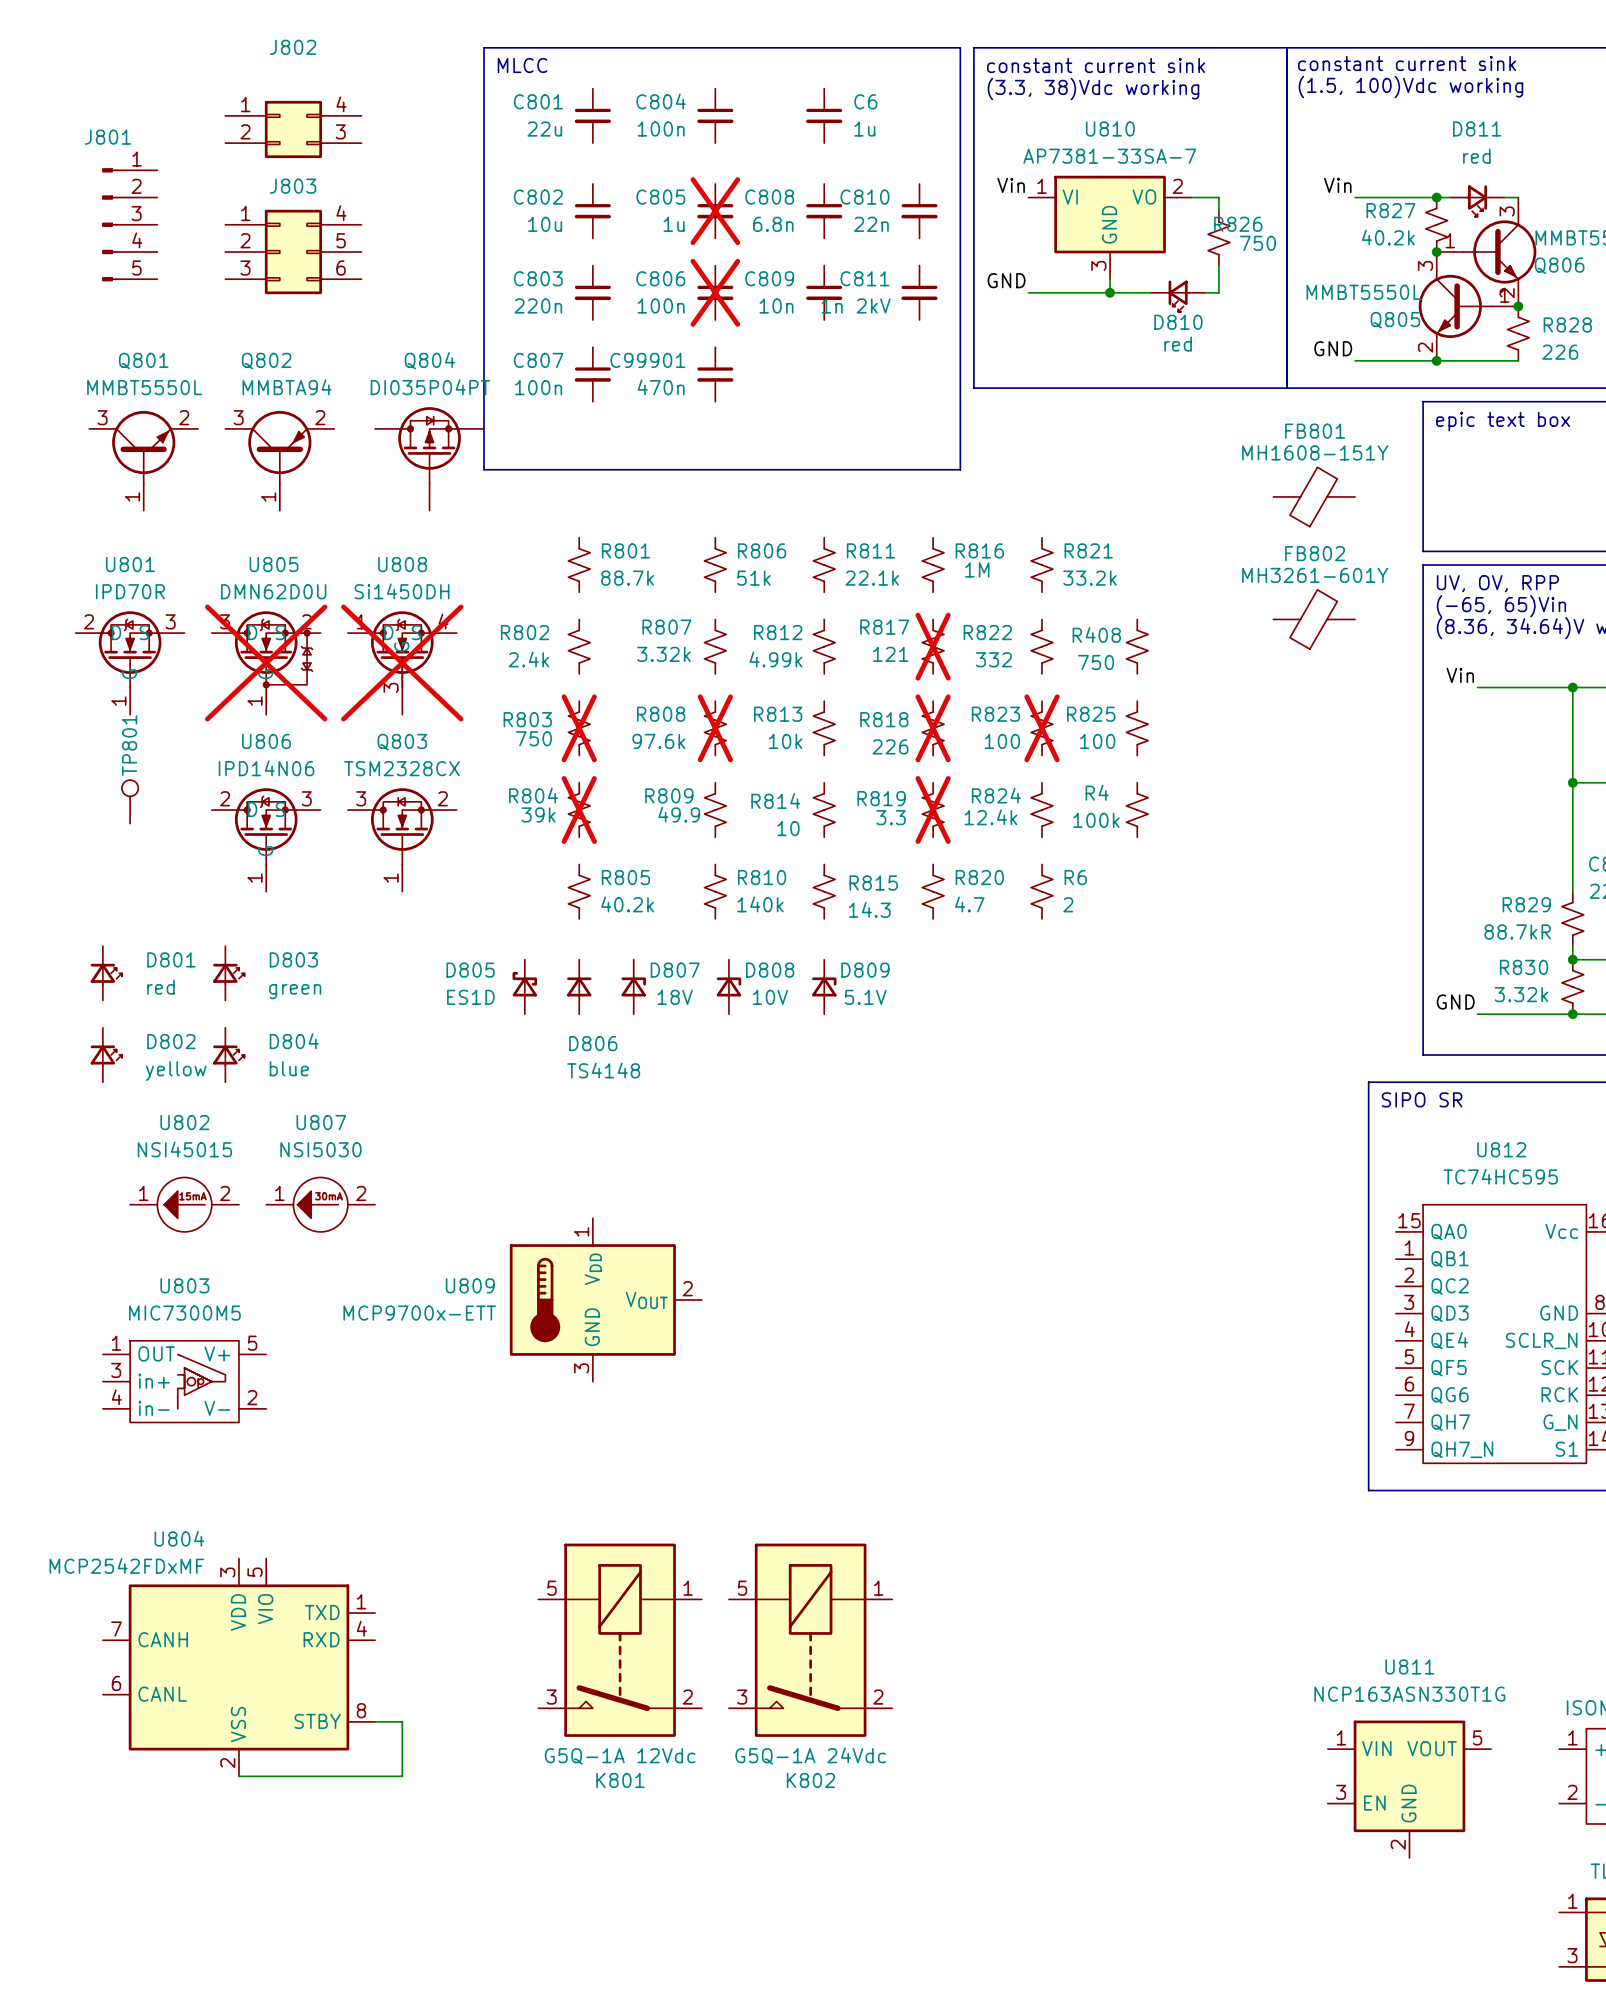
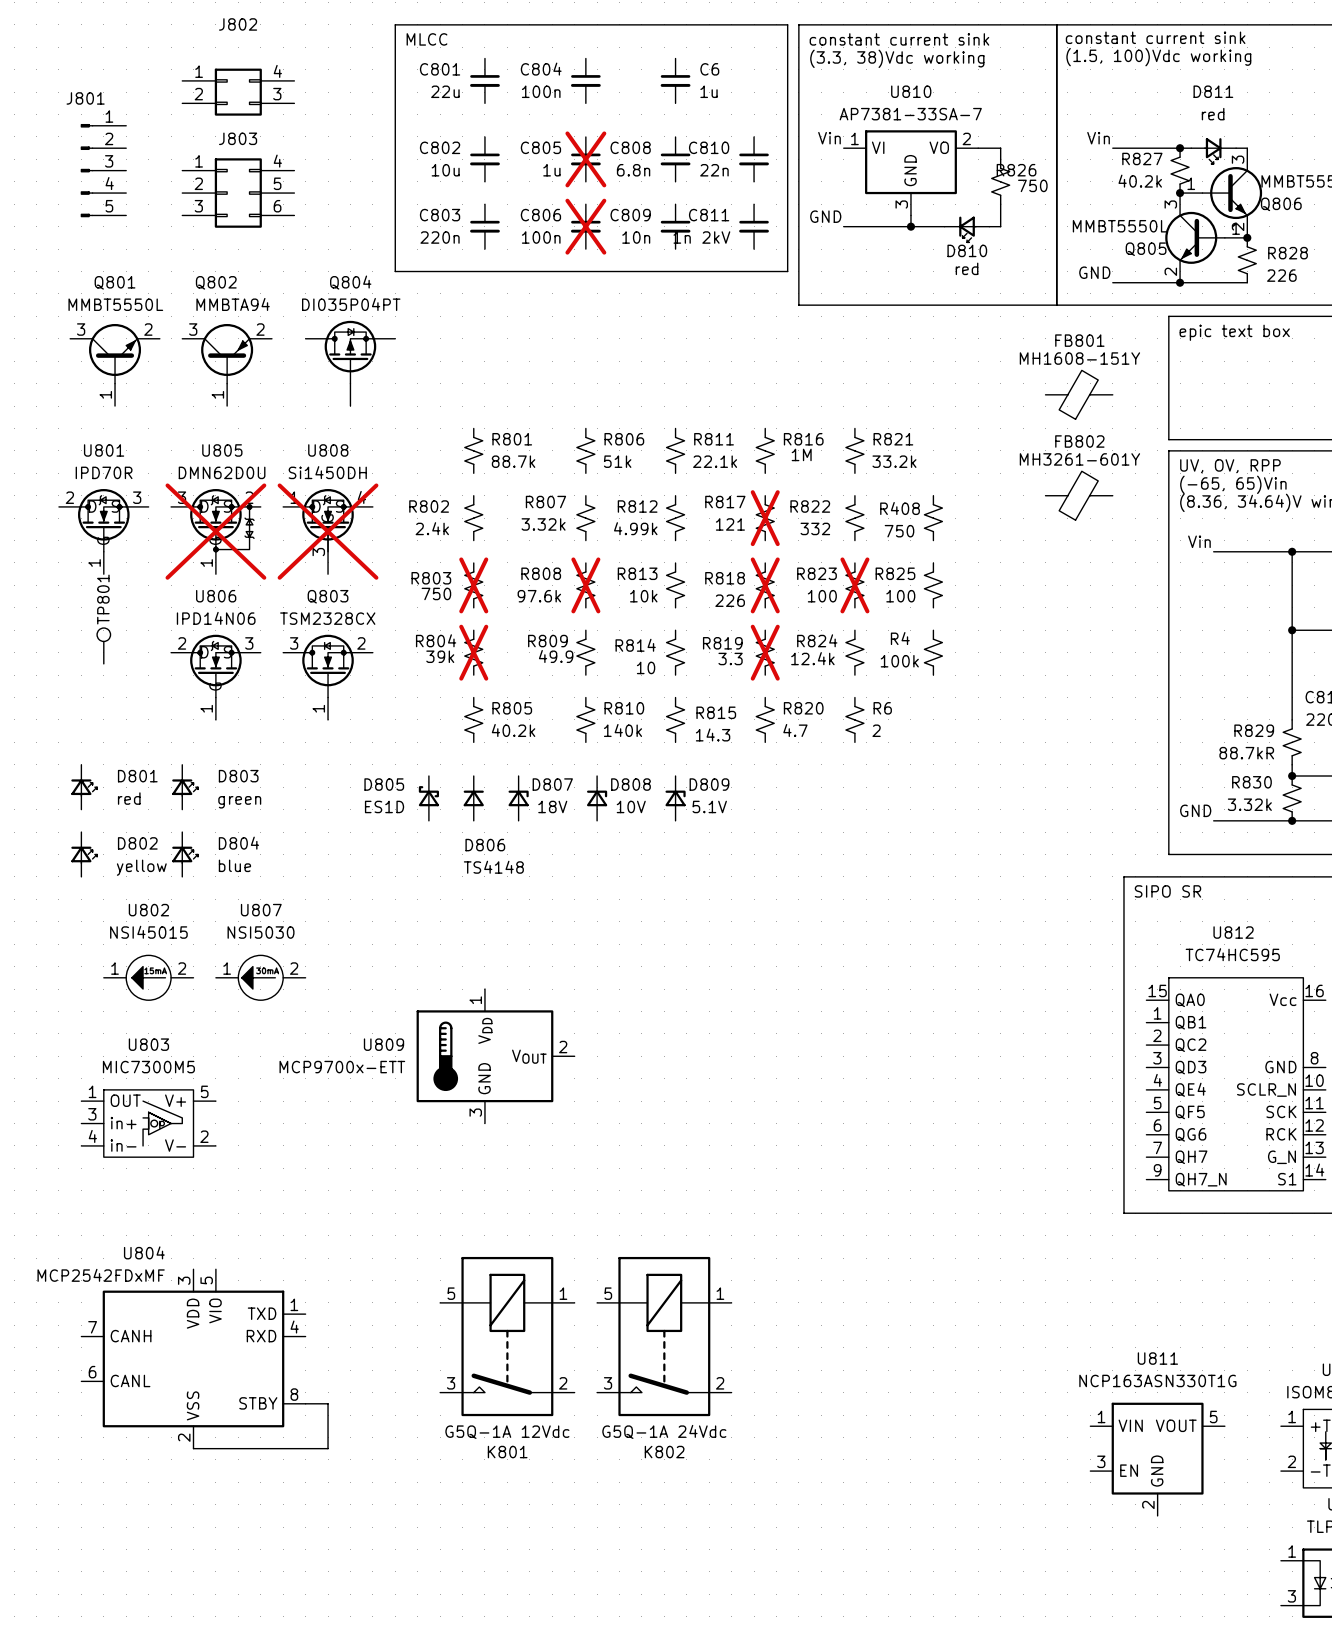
line: (483, 347) (483, 469) (960, 469) (960, 347) -> (395, 271) (787, 271)
C807: 100n (592, 374) -> none
C99901: 470n (715, 374) -> none

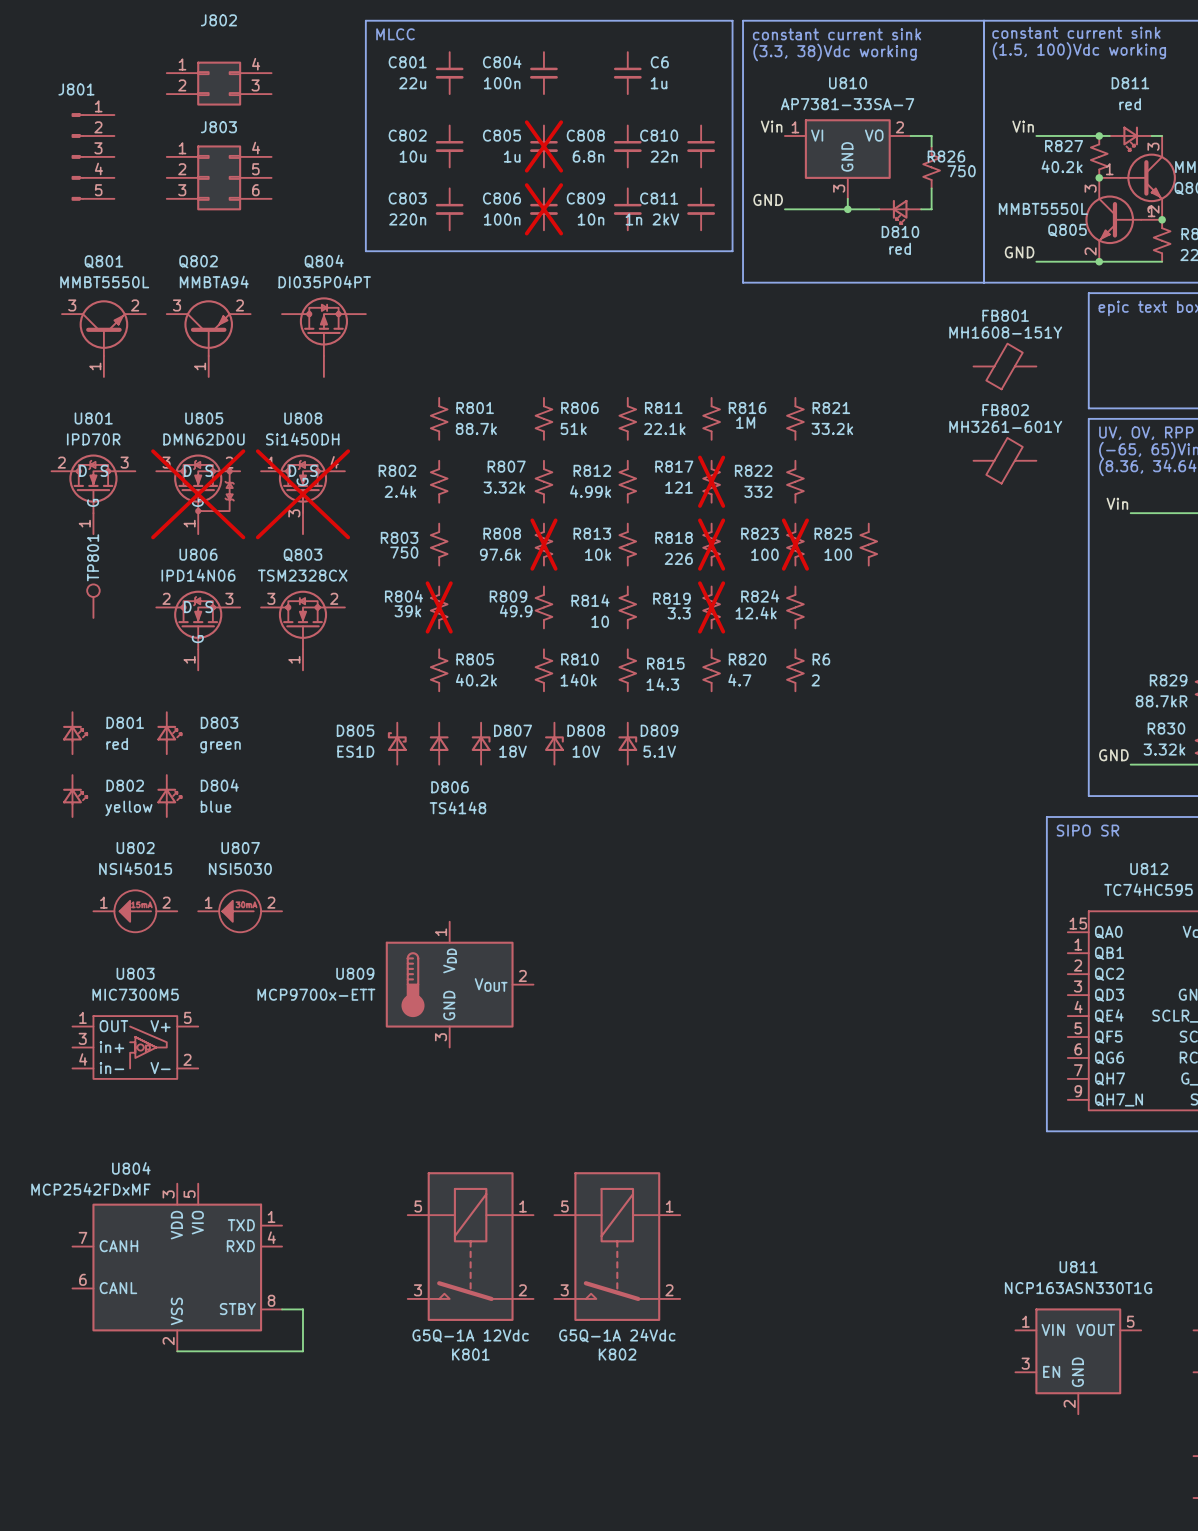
R408: 750 (933, 518) -> none
R803 do-not-place cross: (473, 585) -> none
R4: 100k (933, 652) -> none

